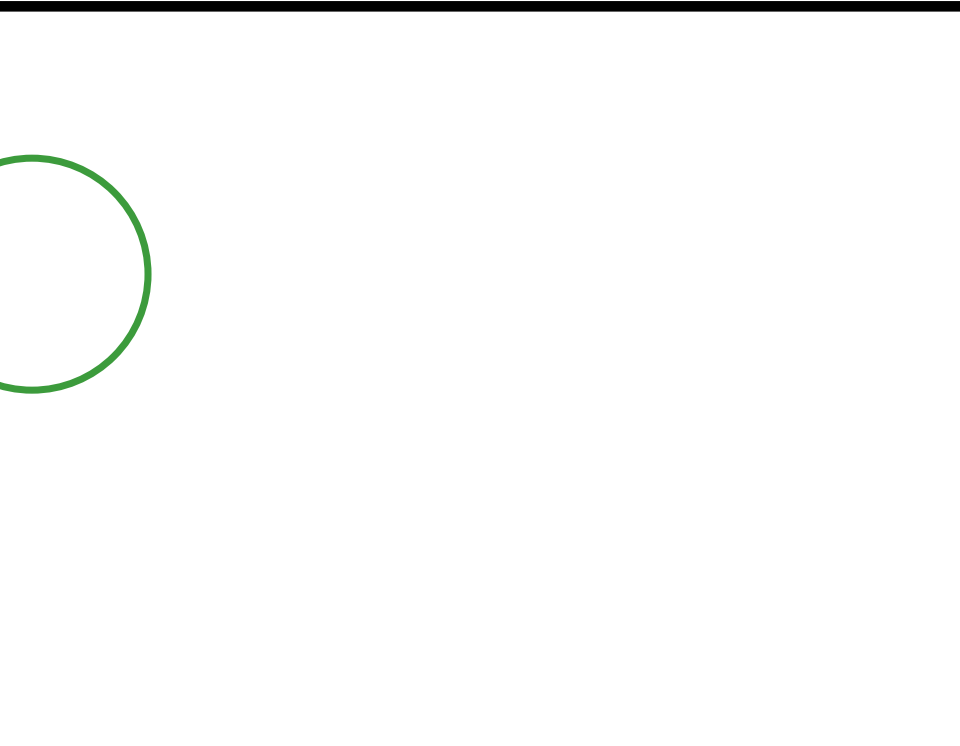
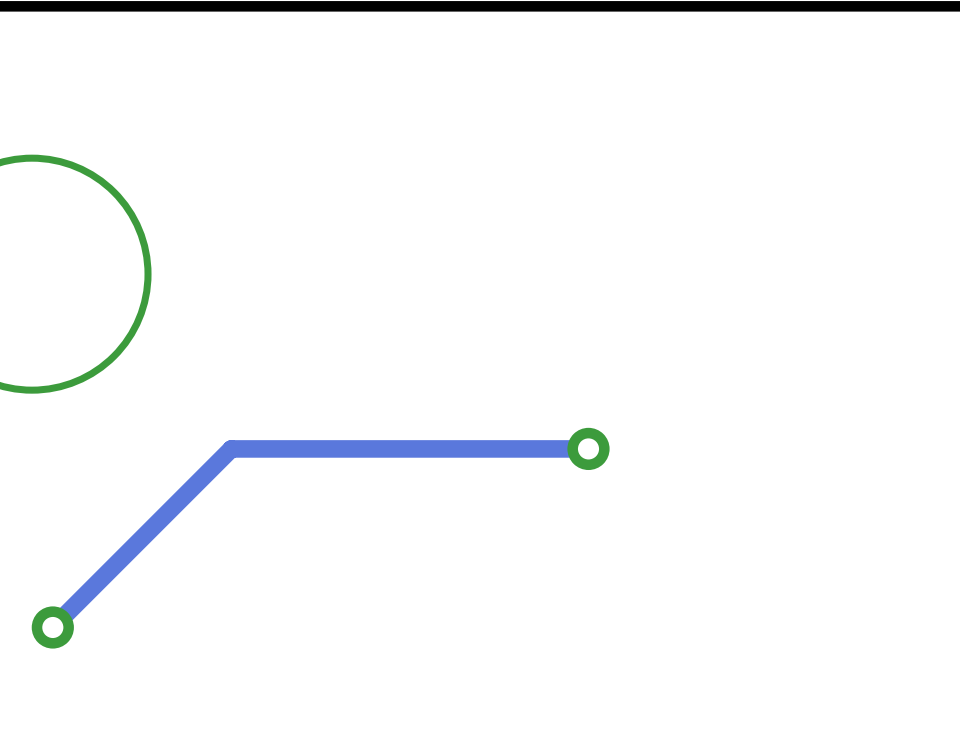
track: none -> (588, 448) (231, 448) (52, 627)
via: none -> (588, 448)
via: none -> (52, 627)

